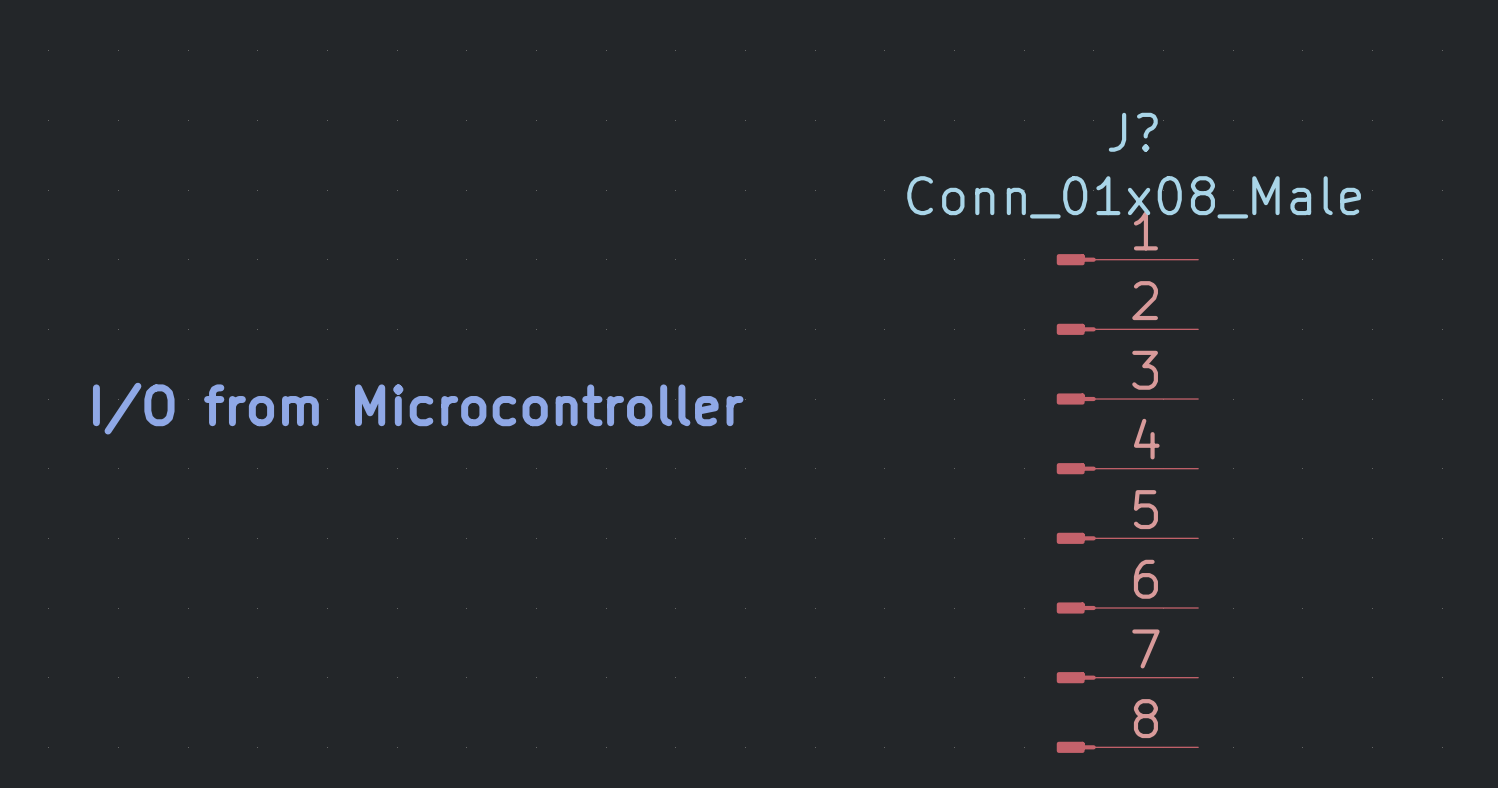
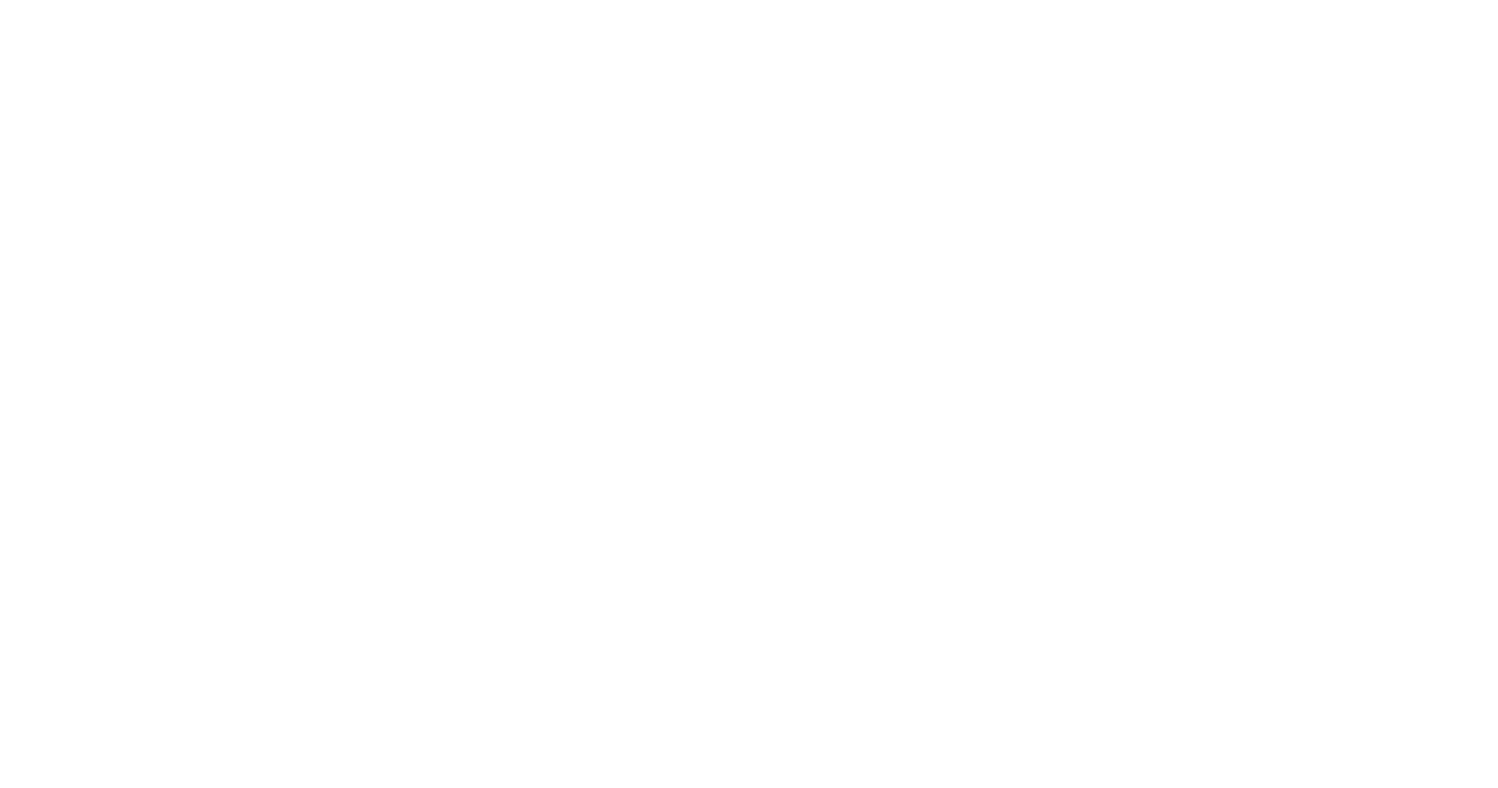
text: I/O from Microcontroller (418, 408) -> none
J?: Conn_01x08_Male (1127, 503) -> none

